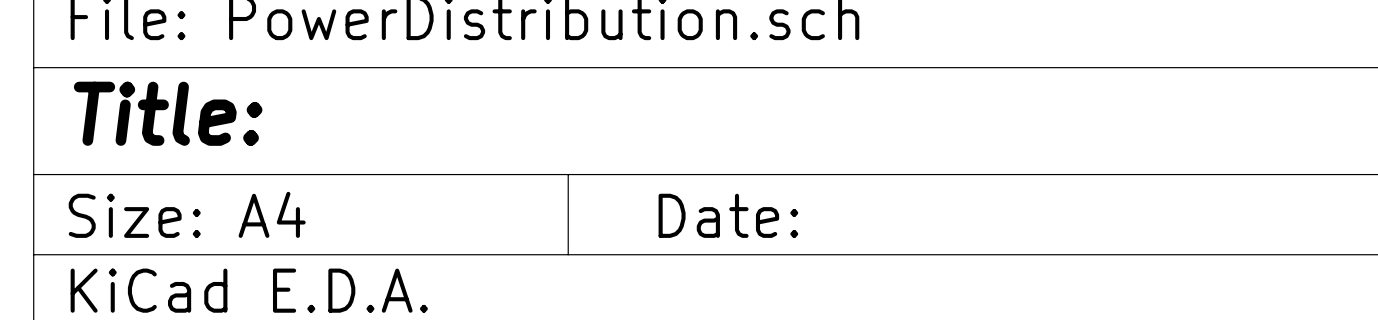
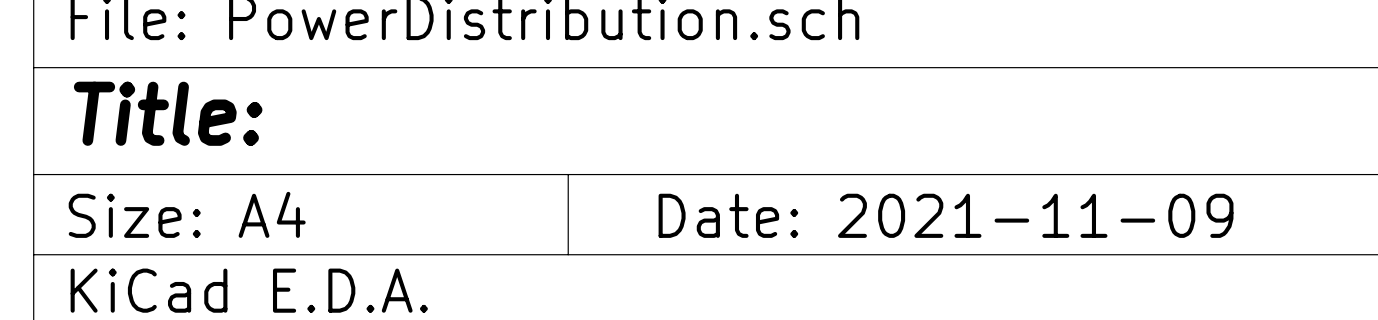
title block: Date: (728, 215) -> Date: 2021-11-09 (946, 215)

